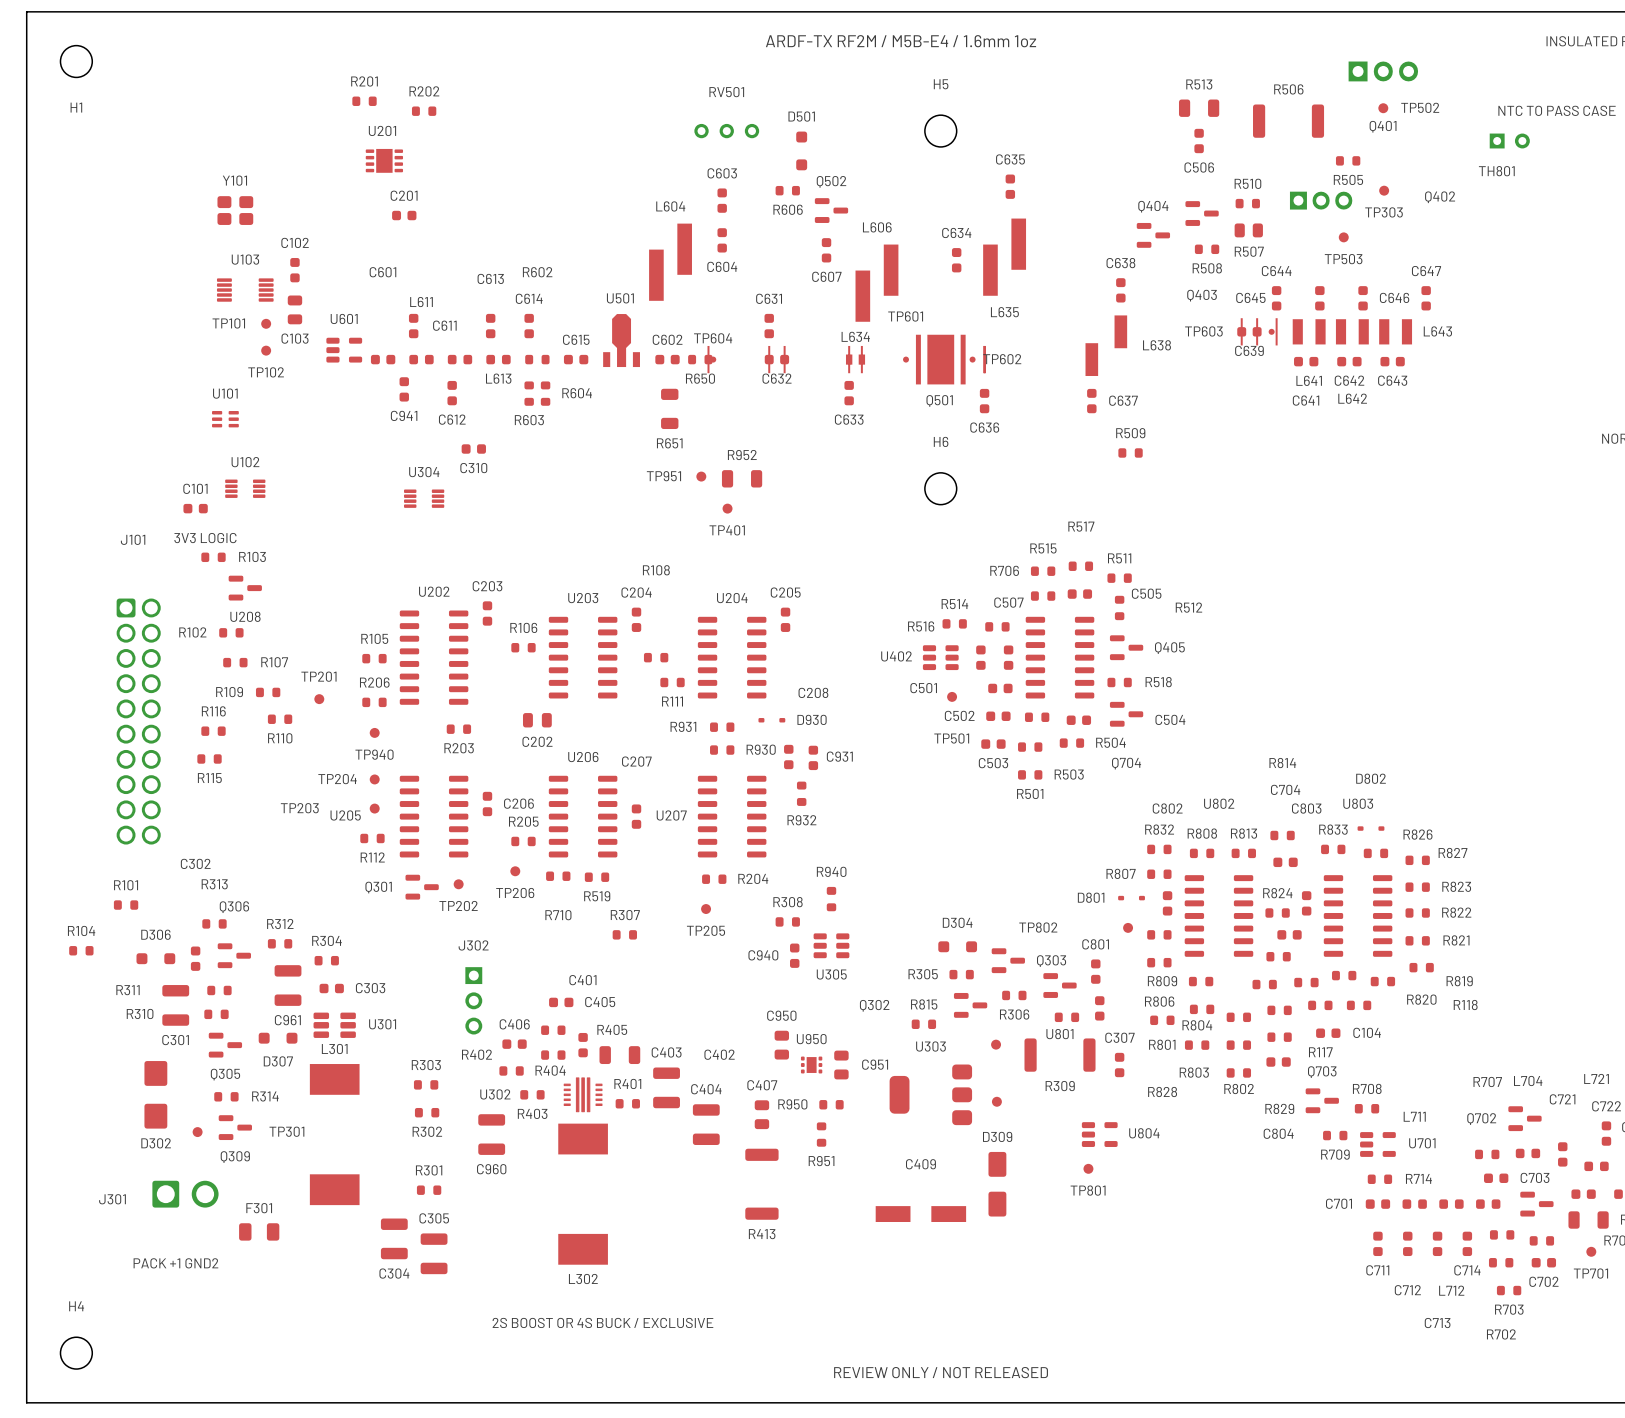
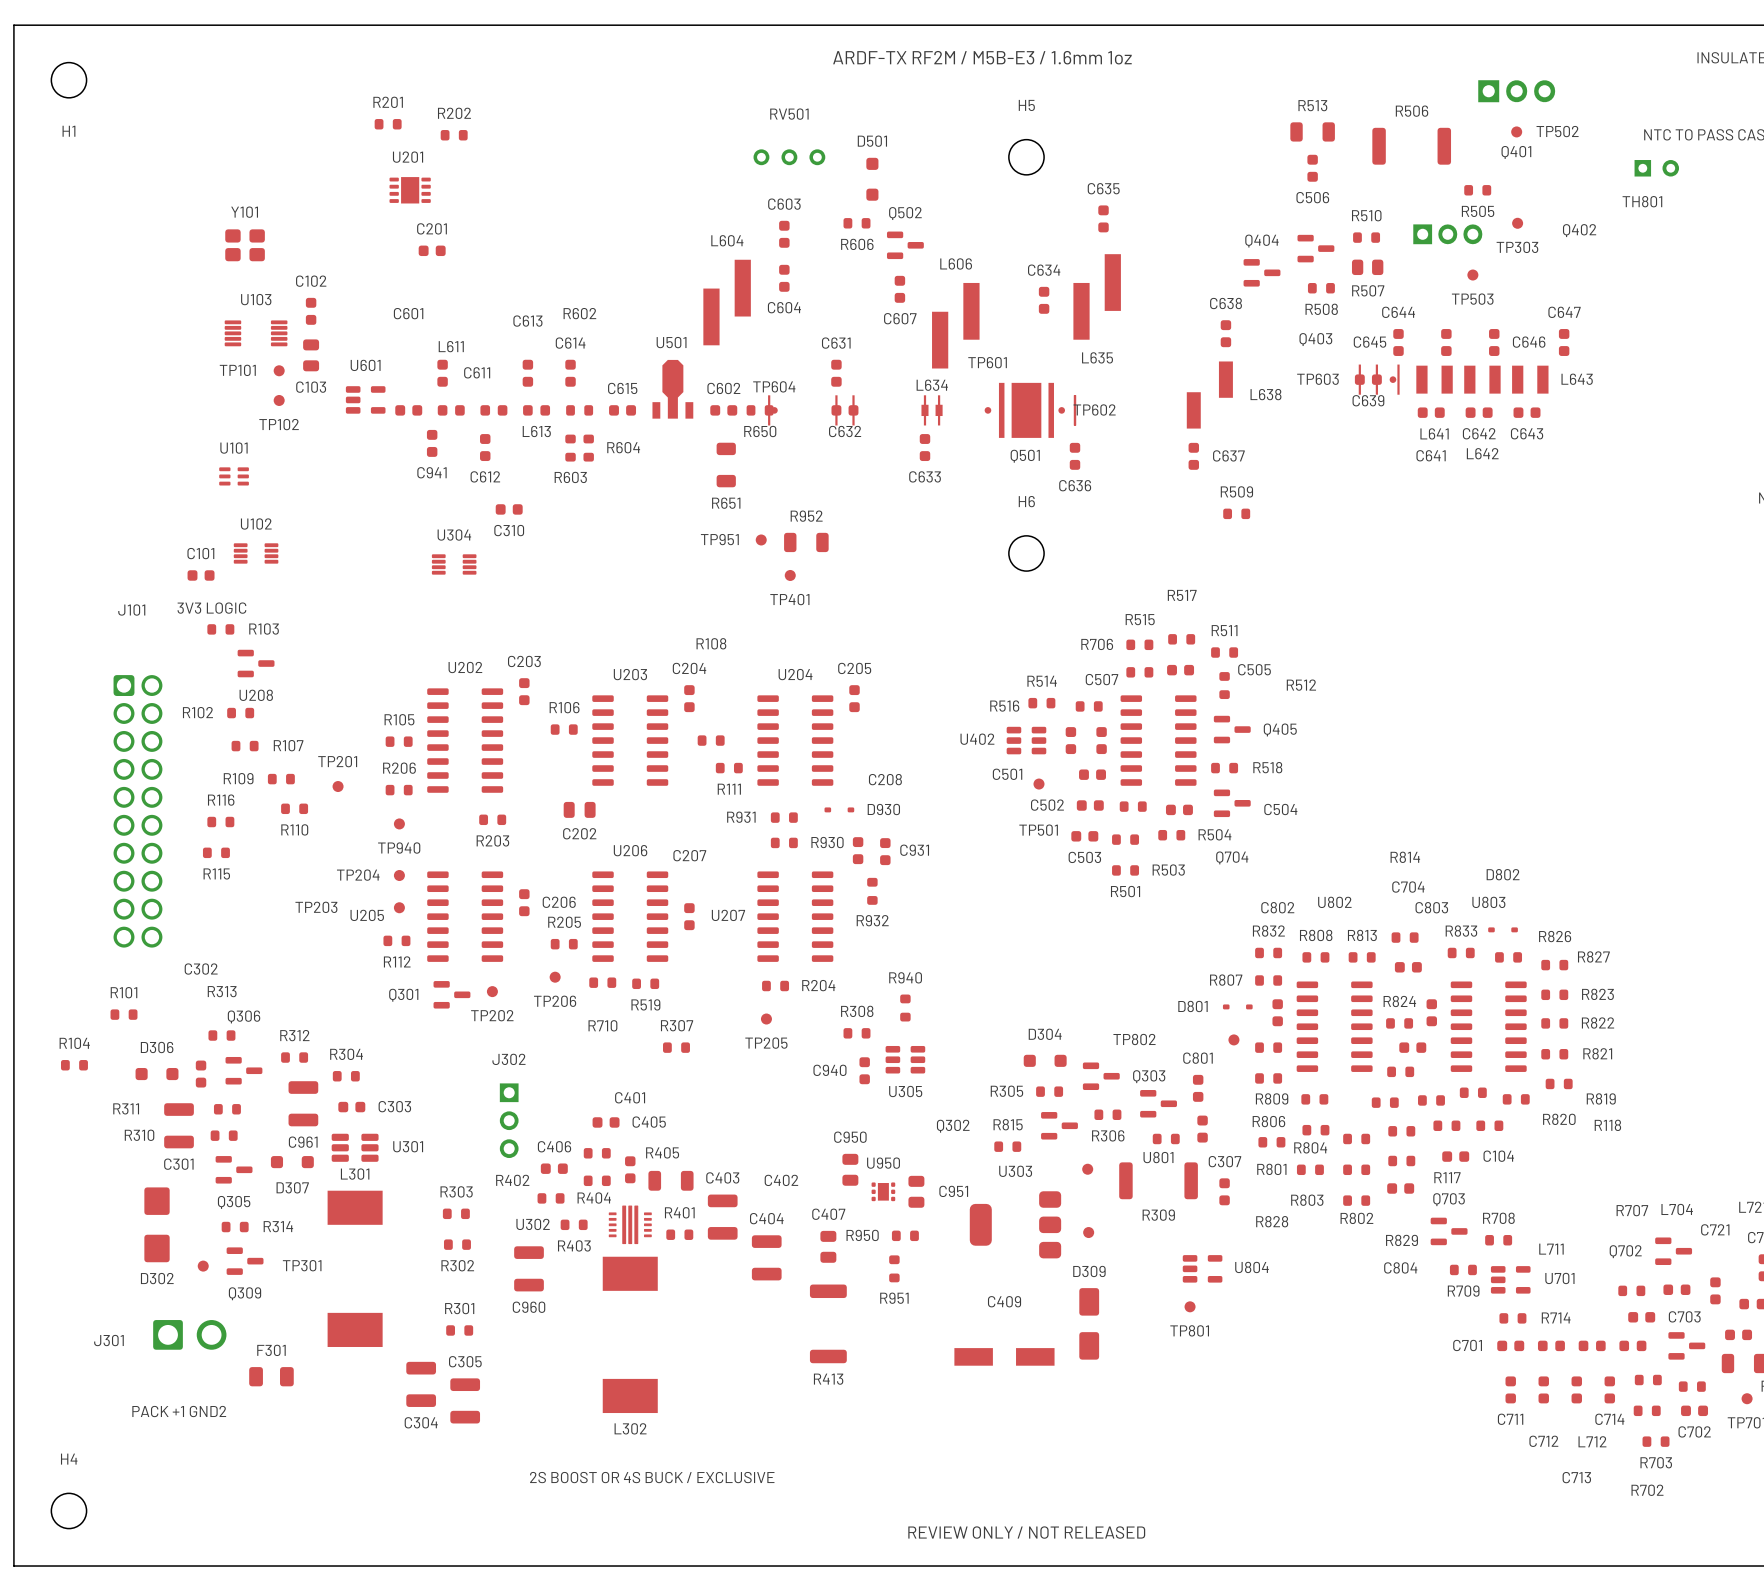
text: ARDF-TX RF2M / M5B-E4 / 1.6mm 1oz (901, 41) -> ARDF-TX RF2M / M5B-E3 / 1.6mm 1oz (982, 57)

